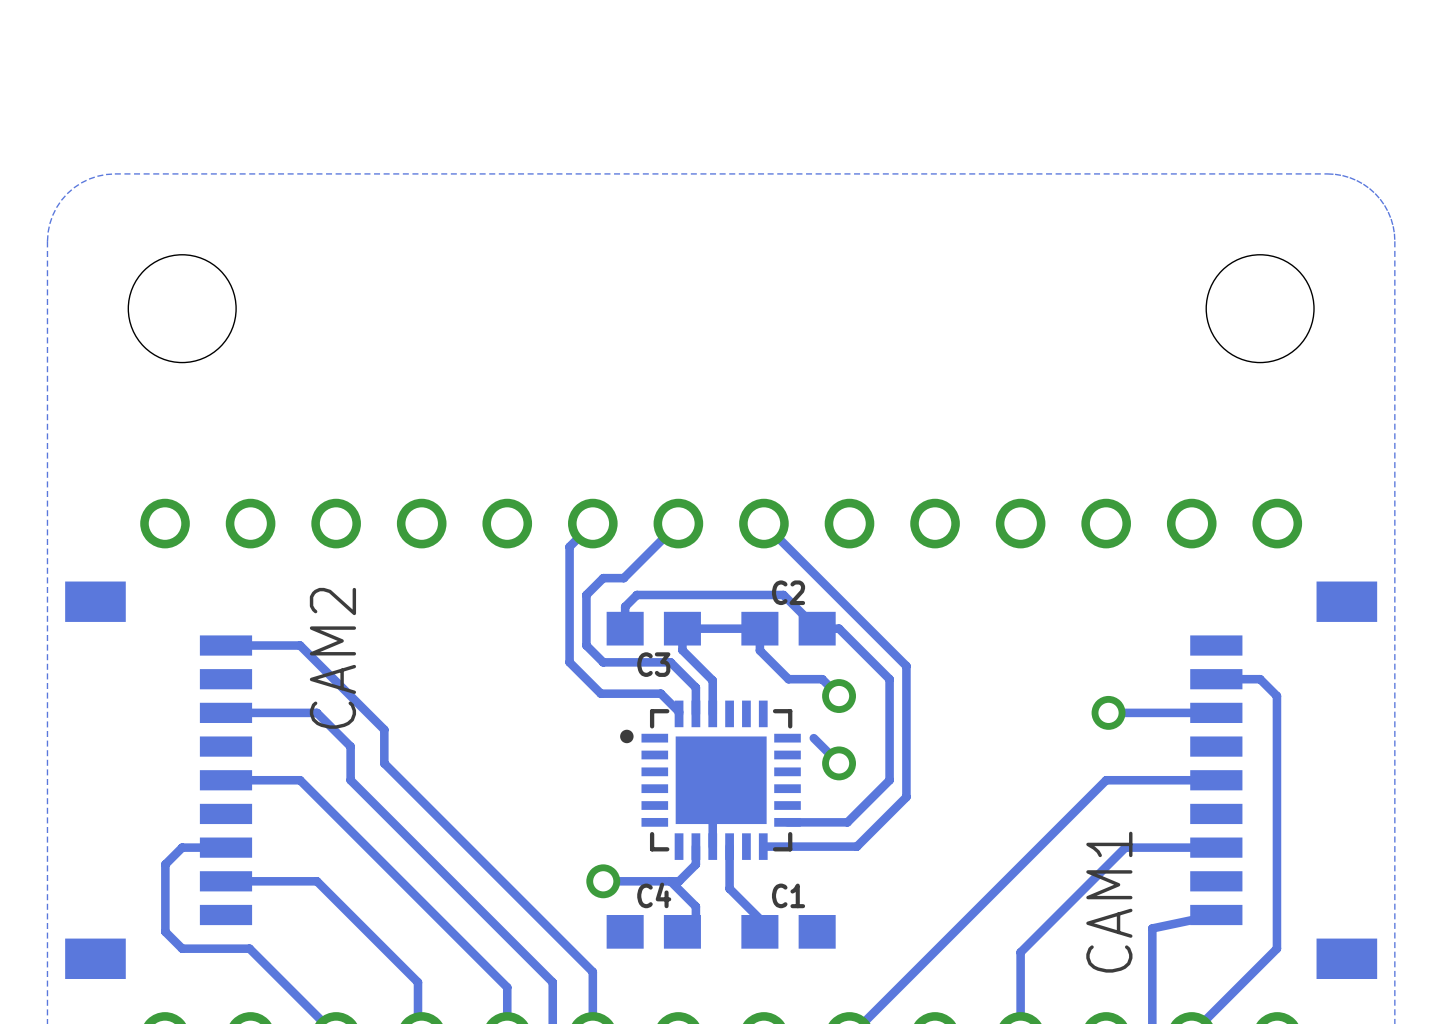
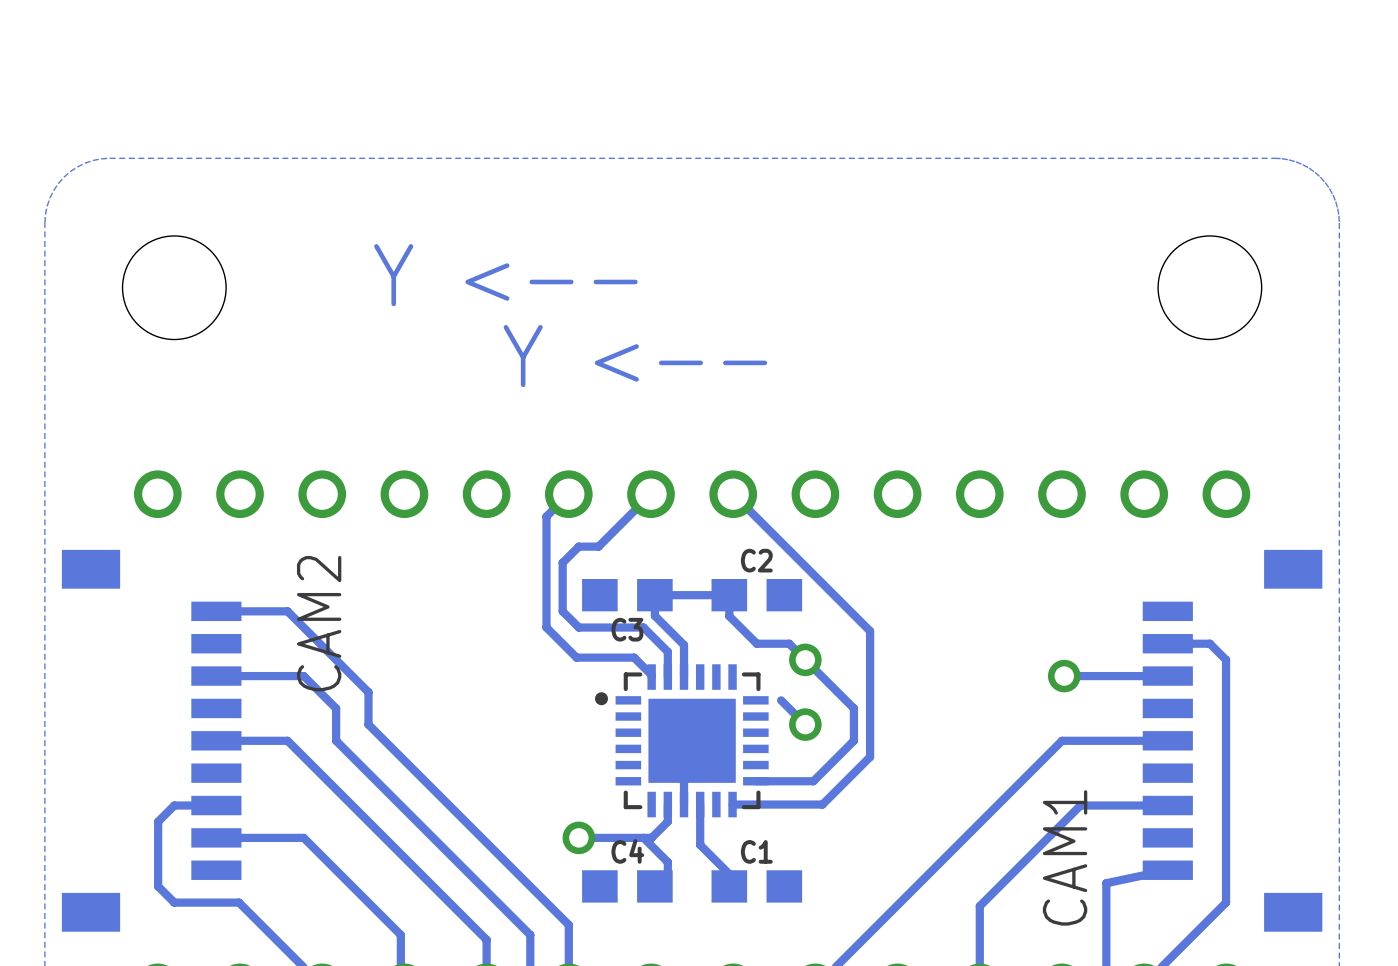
text: none -> Y <-- (505, 275)
text: none -> Y <-- (635, 356)
track: (625, 628) (625, 606) (636, 594) (783, 594) (817, 628) (839, 628) (889, 679) (889, 746) -> (805, 659) (853, 708)

